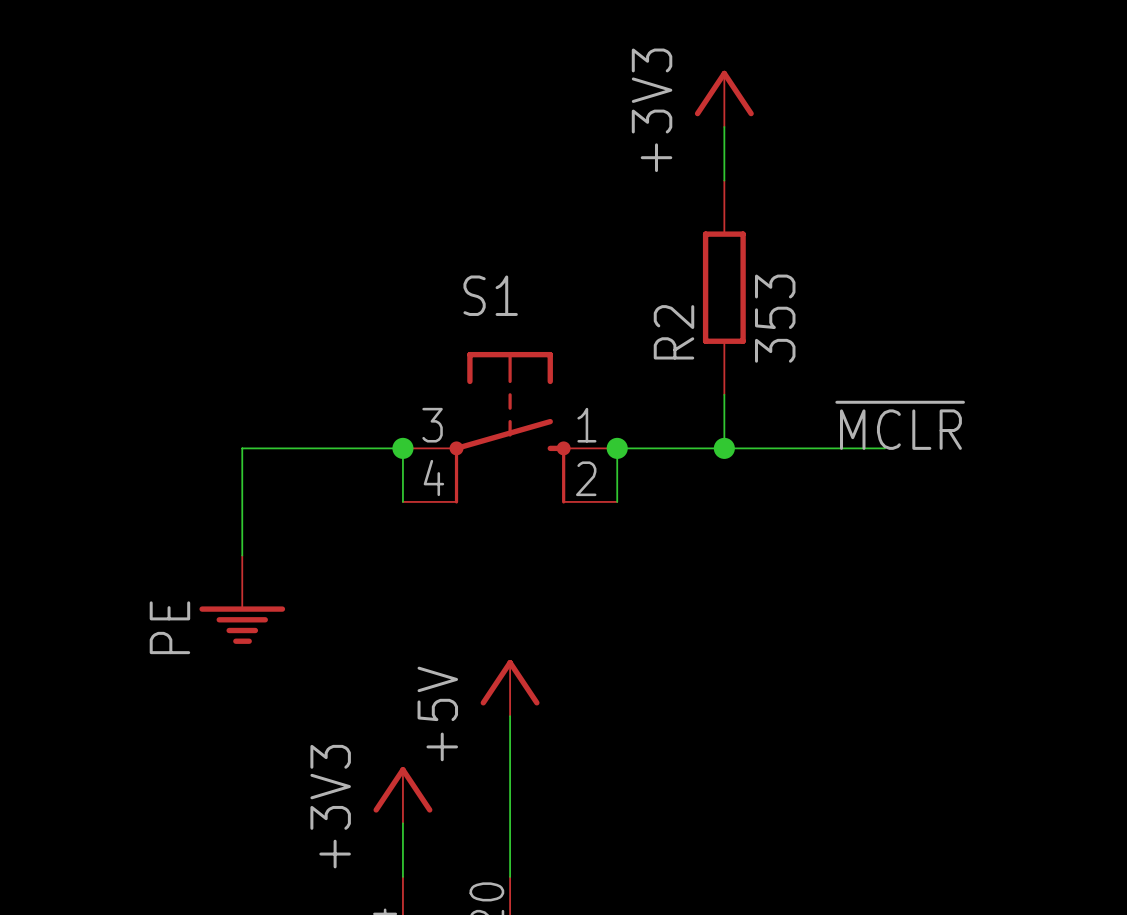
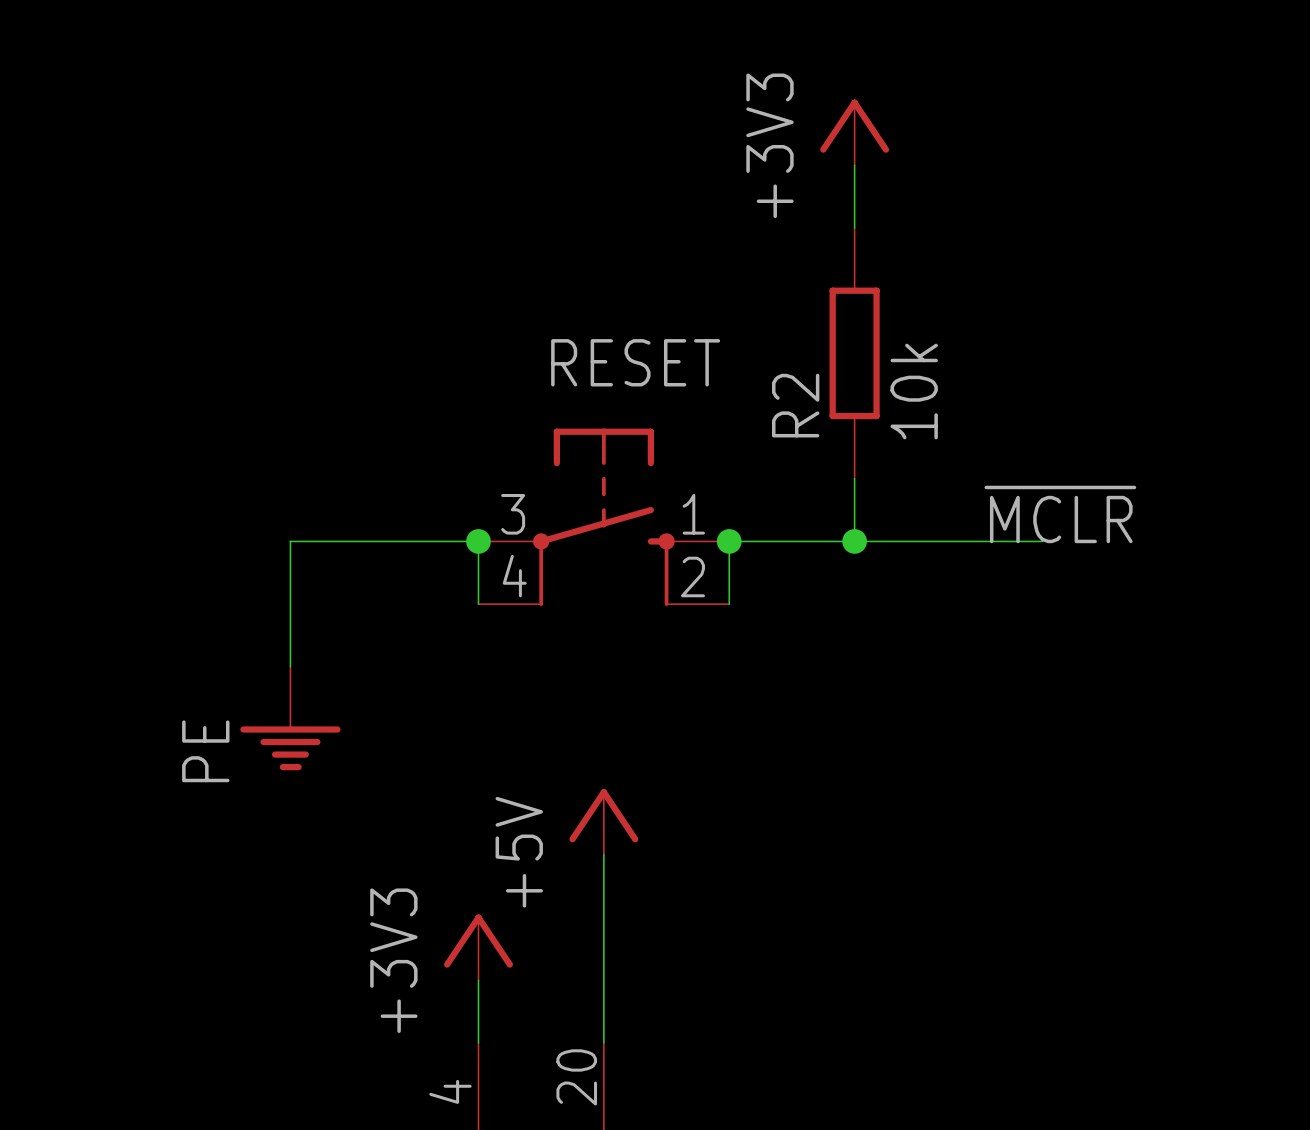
S1 name: S1 (490, 295) -> RESET (635, 362)
R2 value: 353 (775, 318) -> 10k (914, 391)

